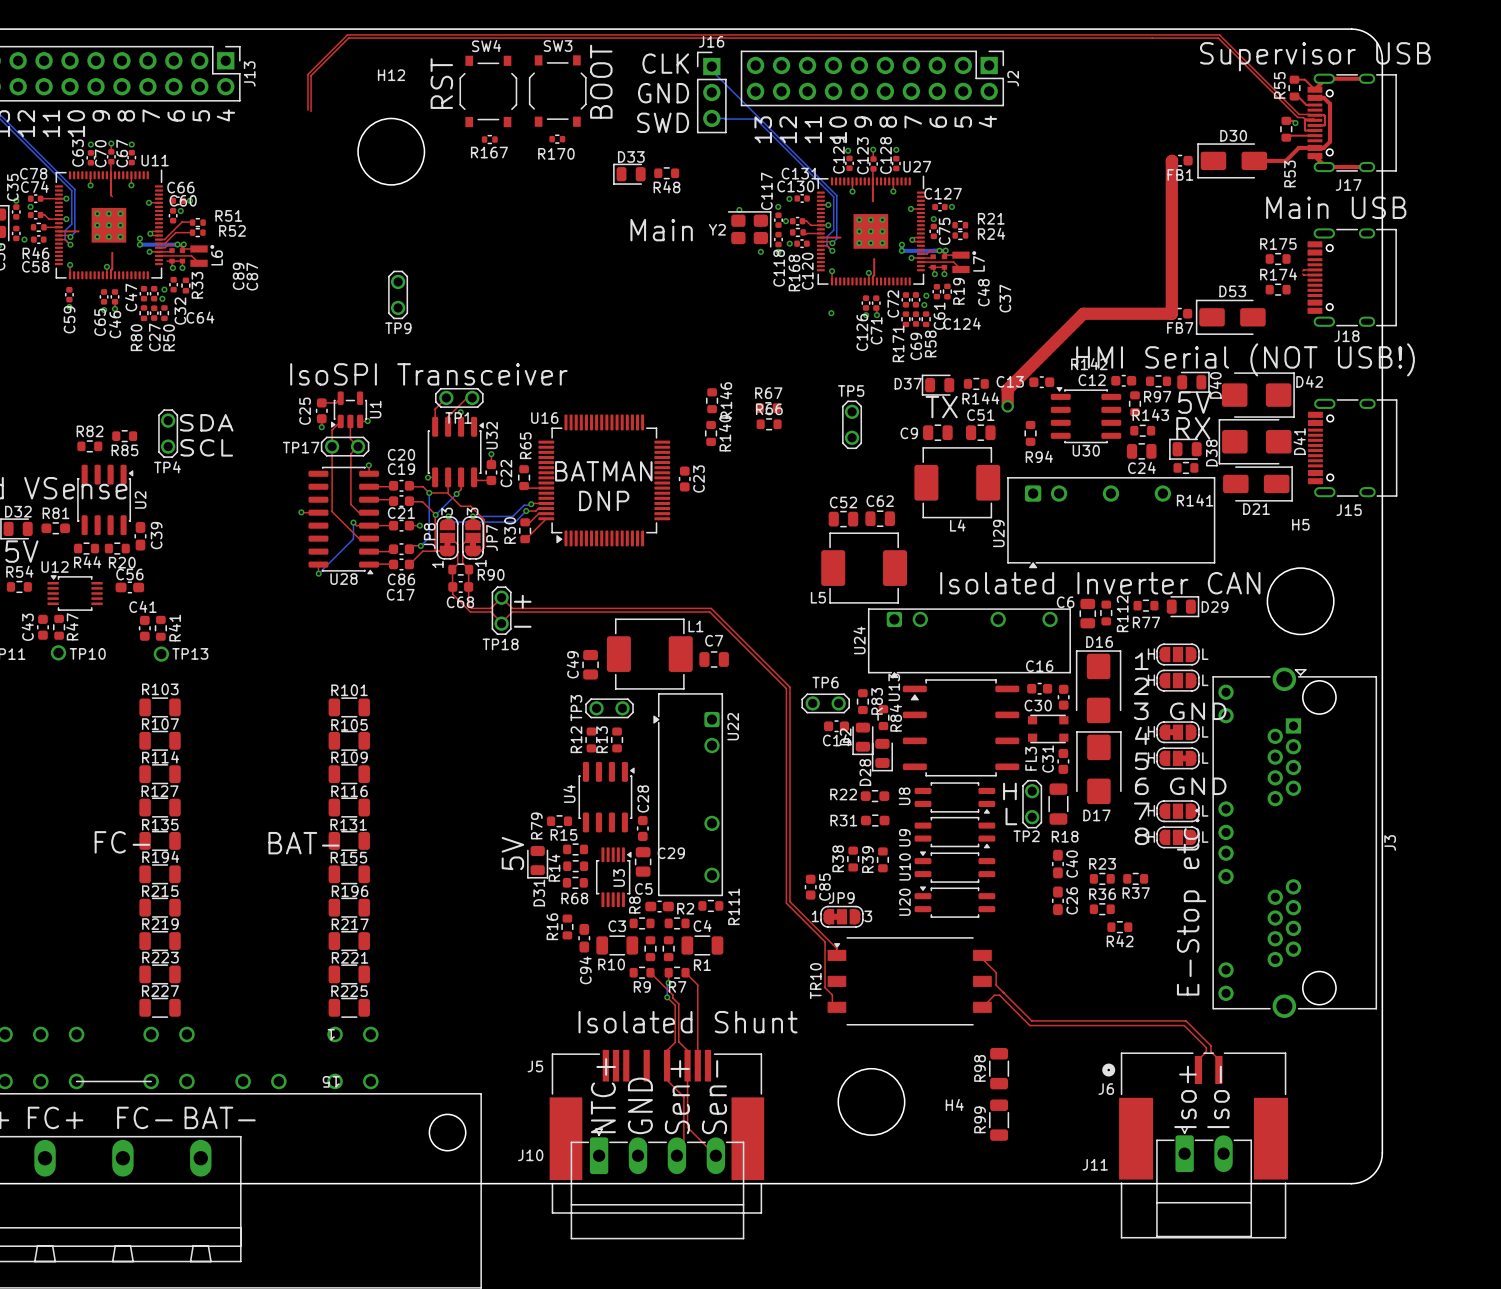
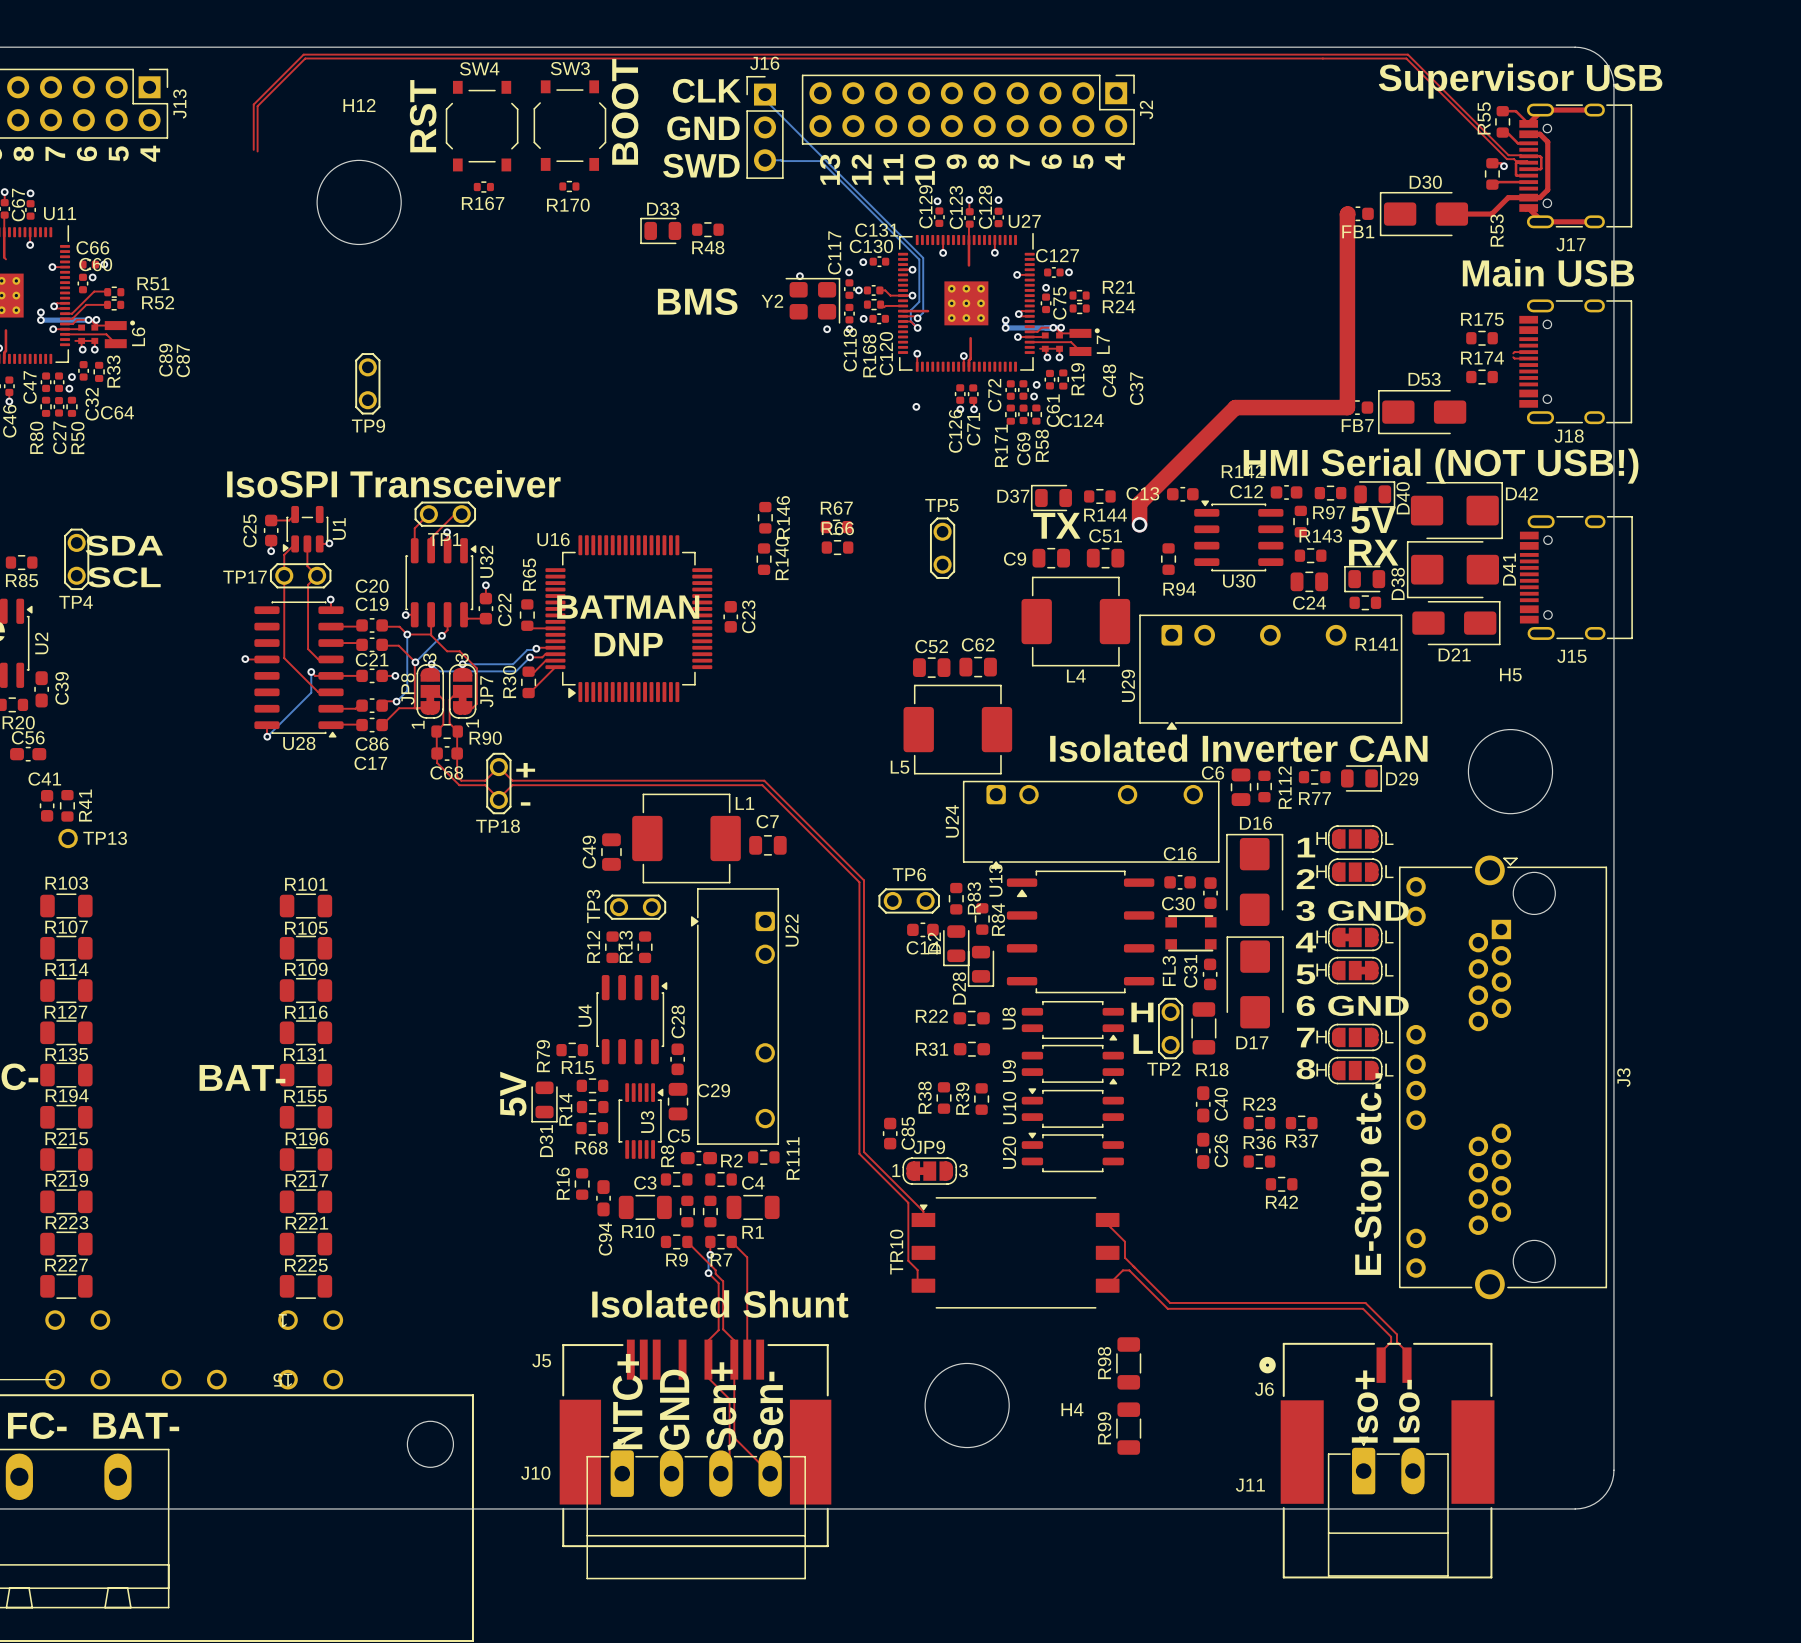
text: Main (661, 230) -> BMS (697, 301)

